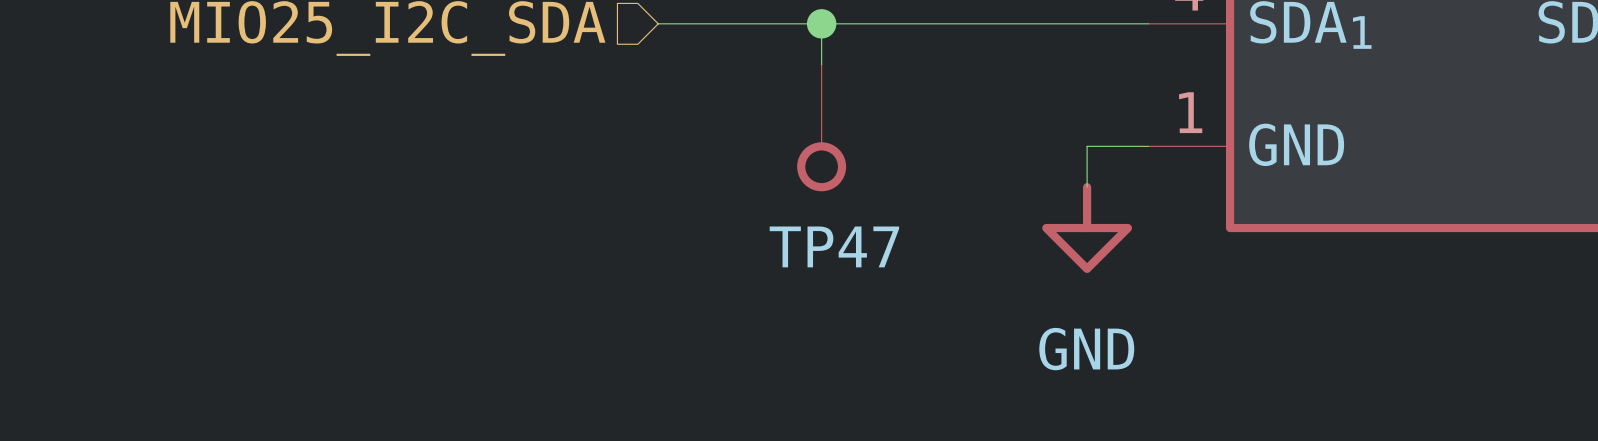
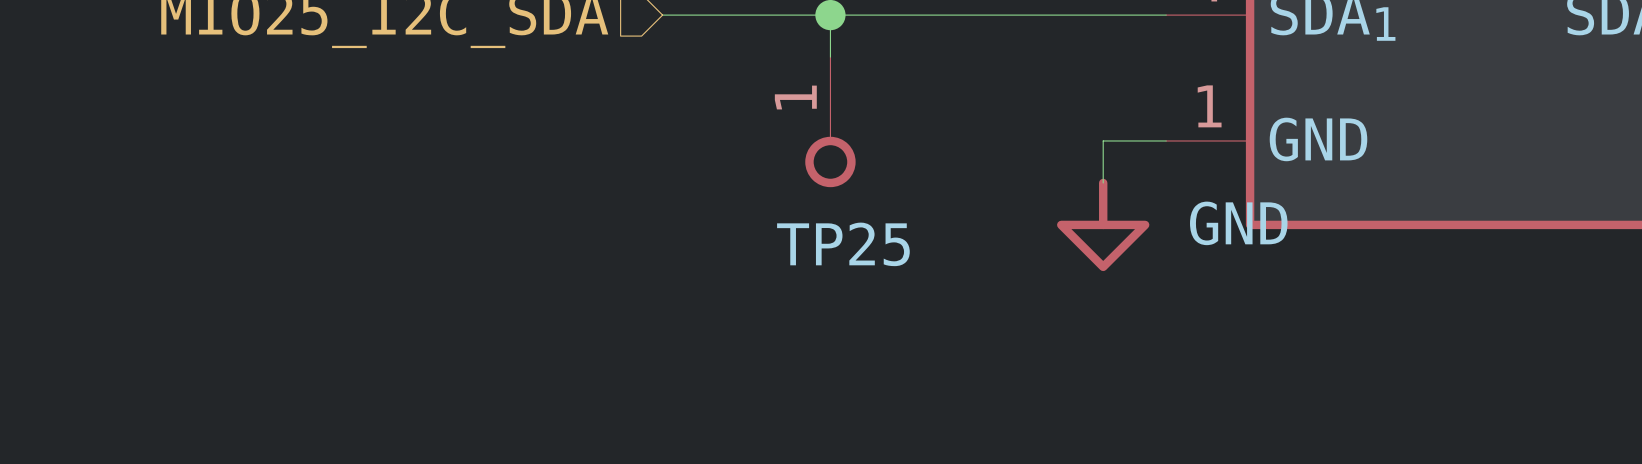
TP47 pin number: none -> 1 (795, 97)
TP47 name: TP47 (834, 246) -> TP25 (843, 244)
power symbol text position: GND (1086, 349) -> GND (1238, 223)

